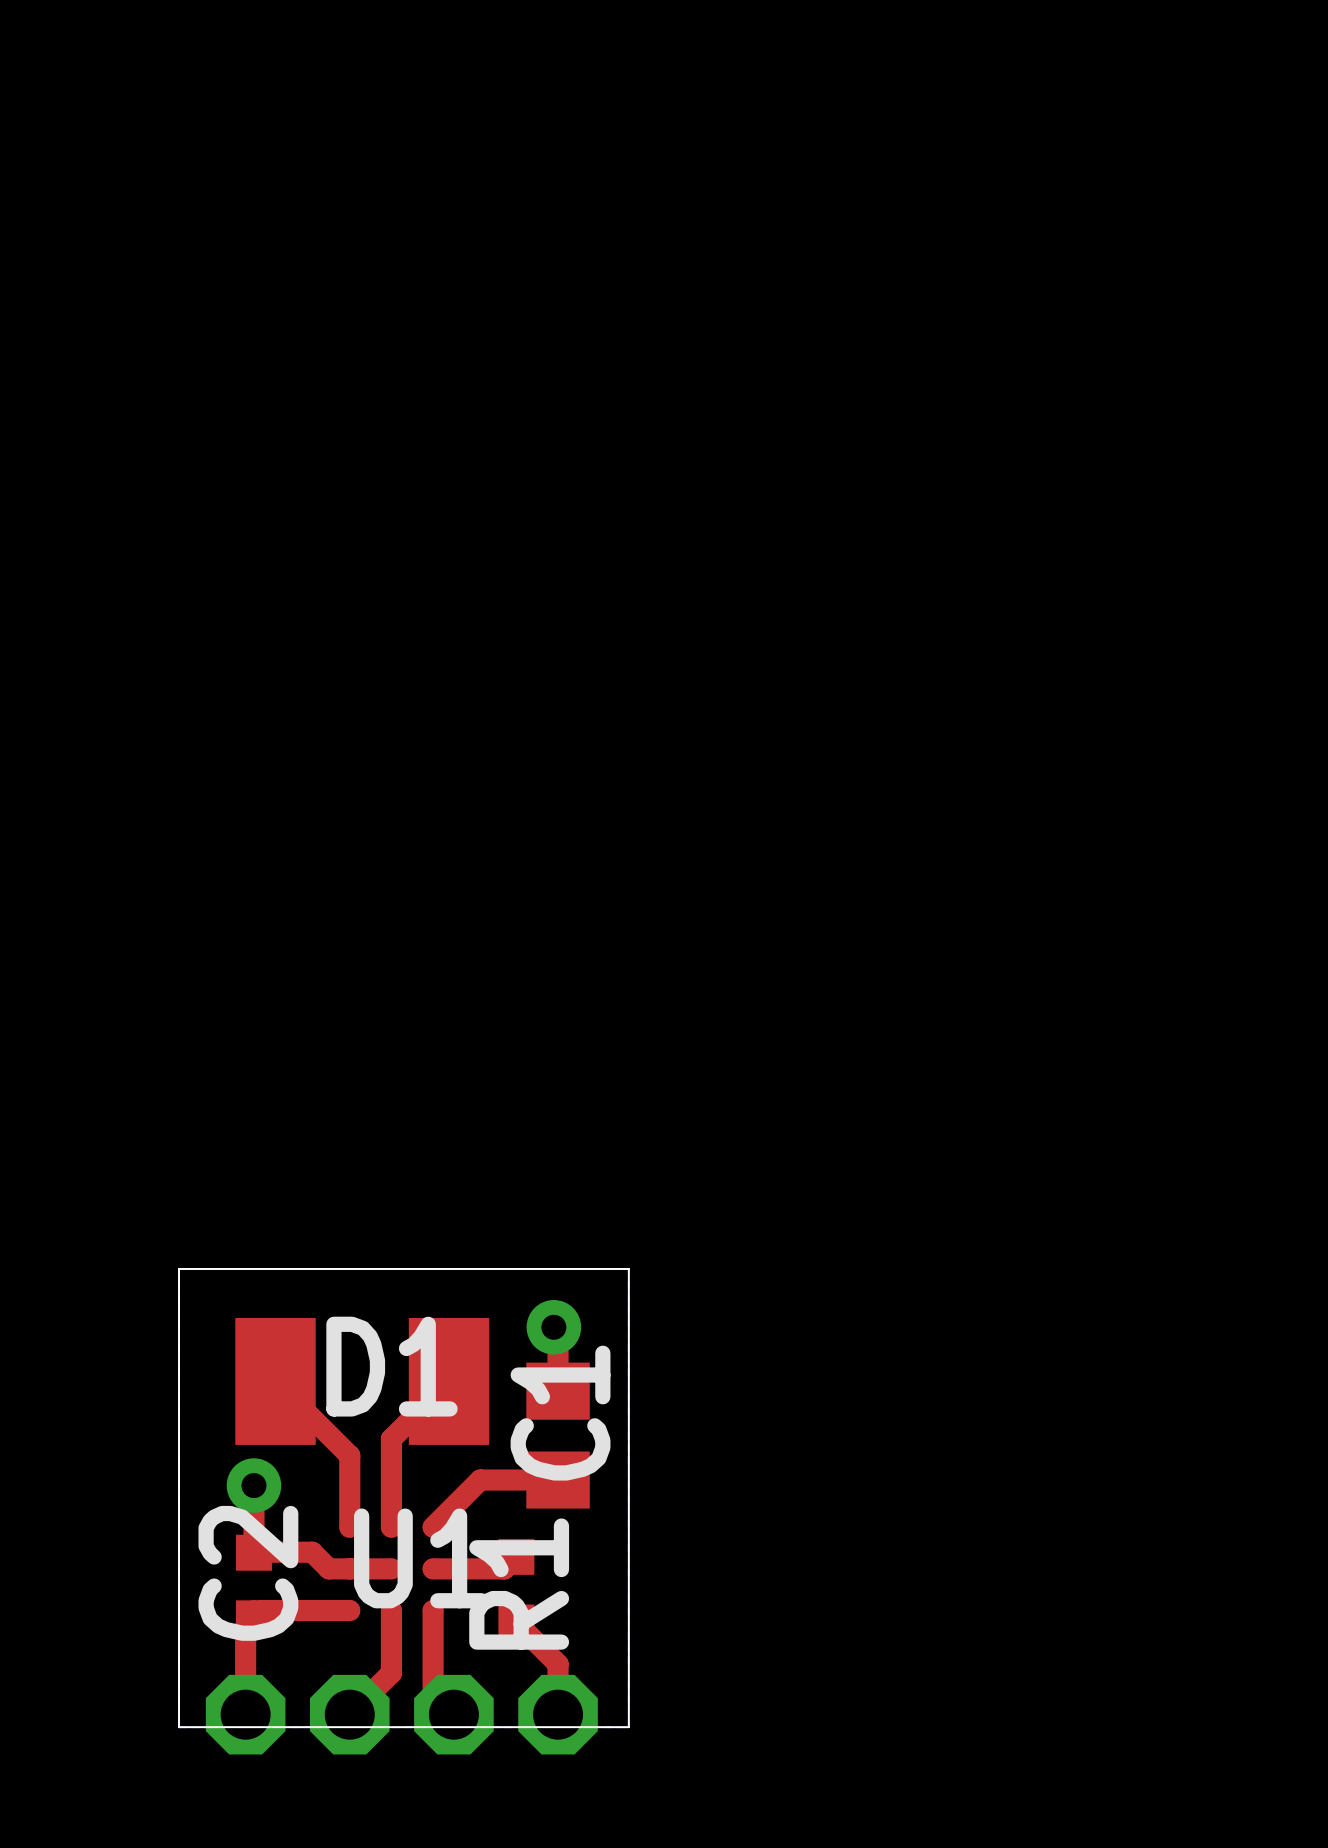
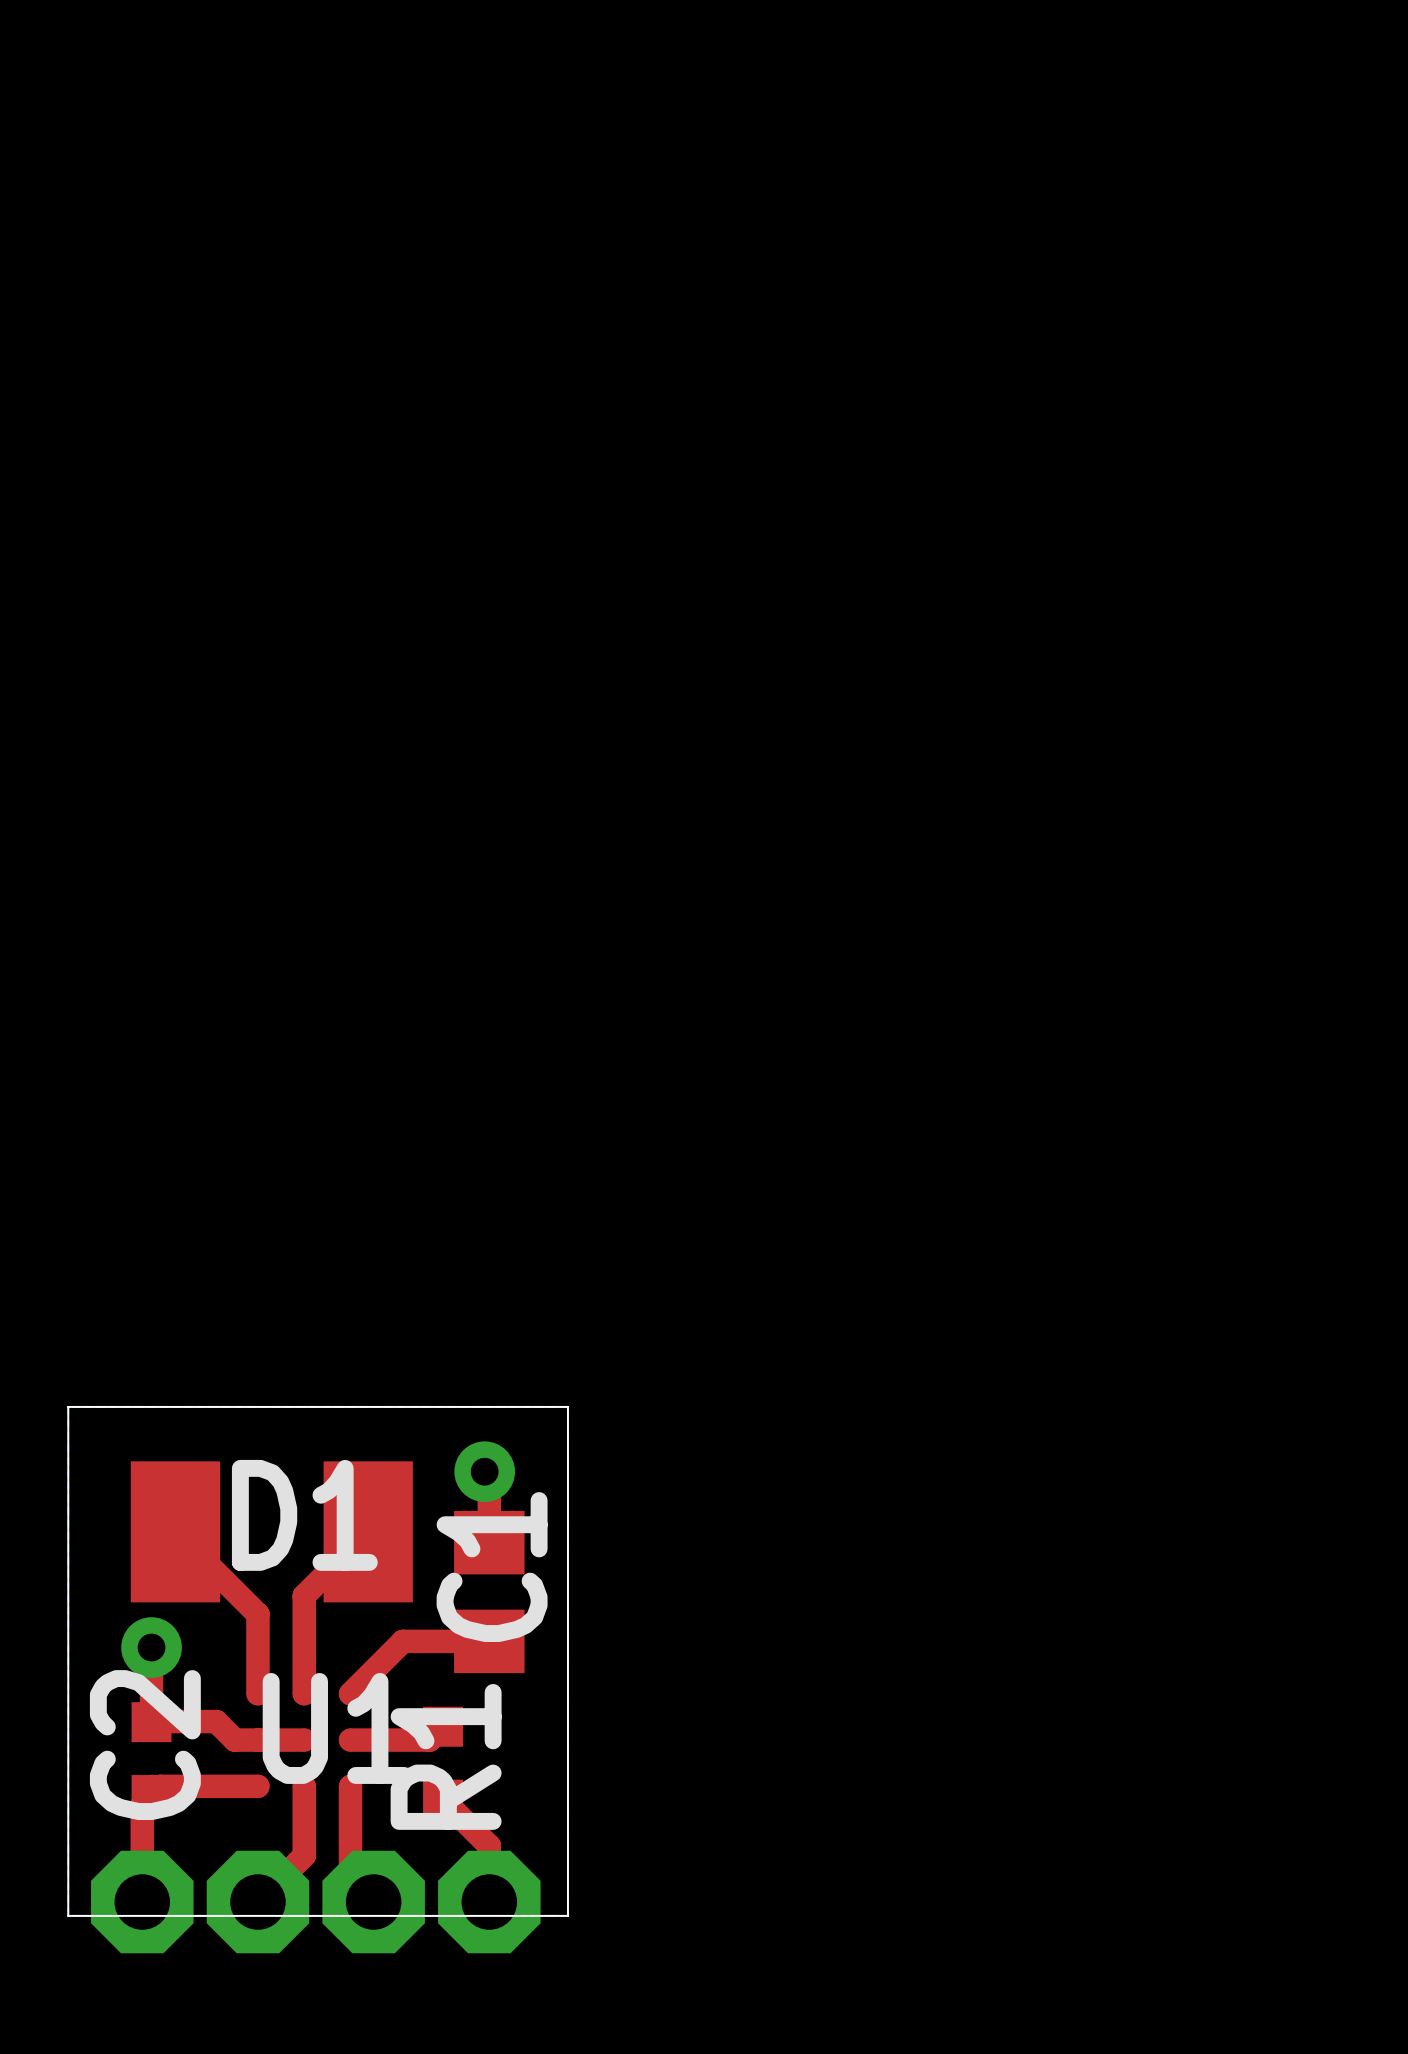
part footprint: [205, 1674, 286, 1755] -> [91, 1850, 194, 1954]
part footprint: [309, 1674, 390, 1755] -> [206, 1850, 310, 1954]
part footprint: [414, 1674, 494, 1755] -> [322, 1850, 425, 1954]
part footprint: [518, 1674, 598, 1755] -> [438, 1850, 541, 1954]

